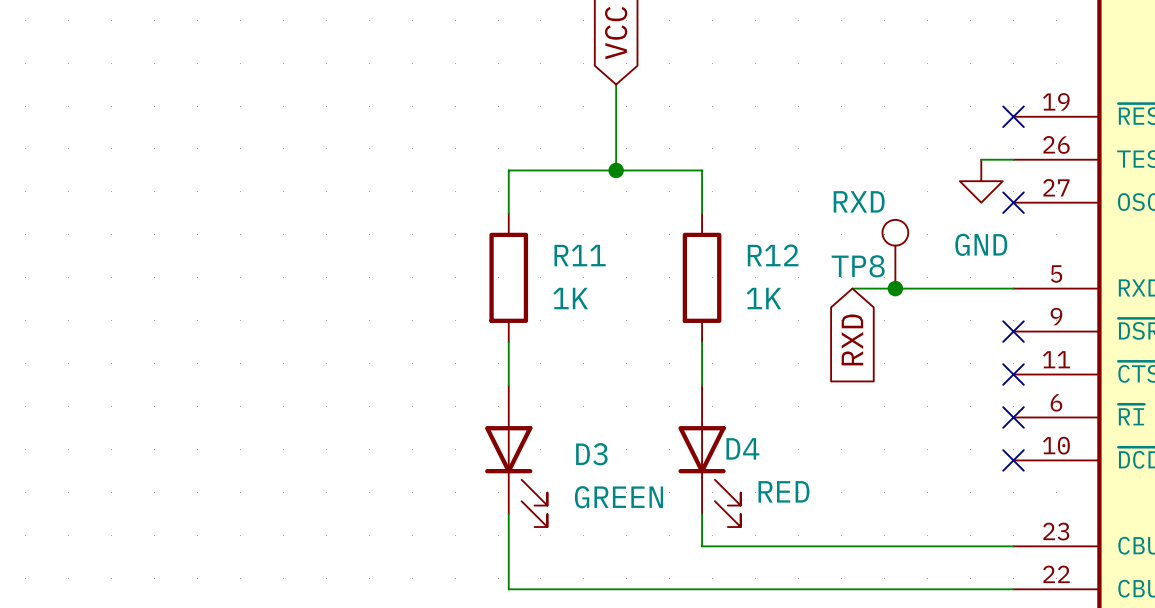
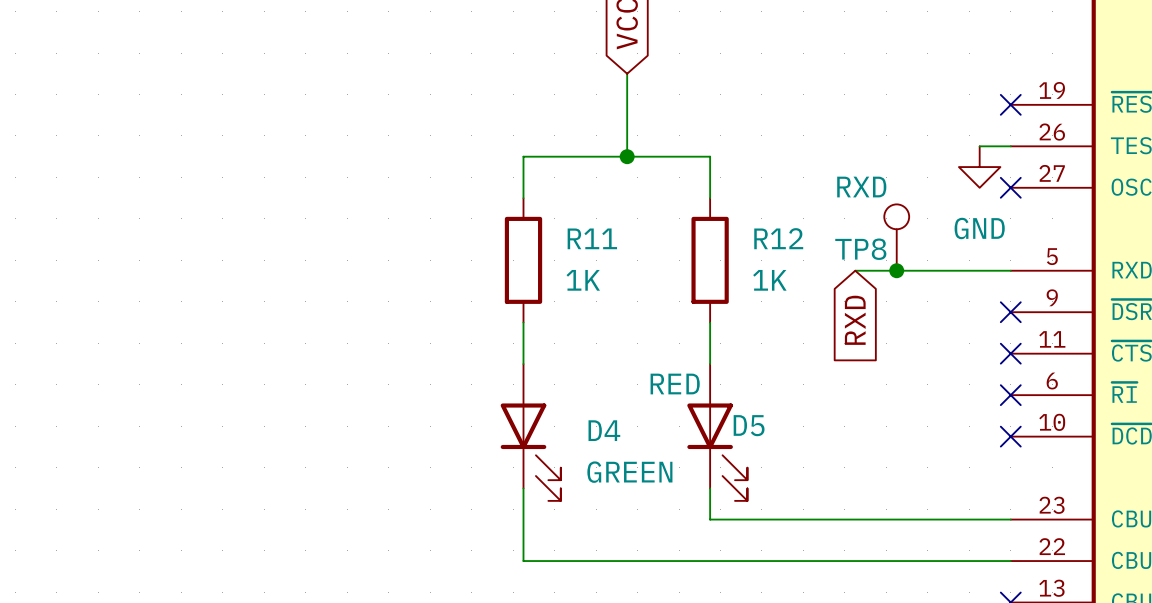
D4 name: D4 (742, 448) -> D5 (749, 425)
D3 name: D3 (591, 454) -> D4 (604, 430)
D4 value position: RED (783, 491) -> RED (675, 384)

